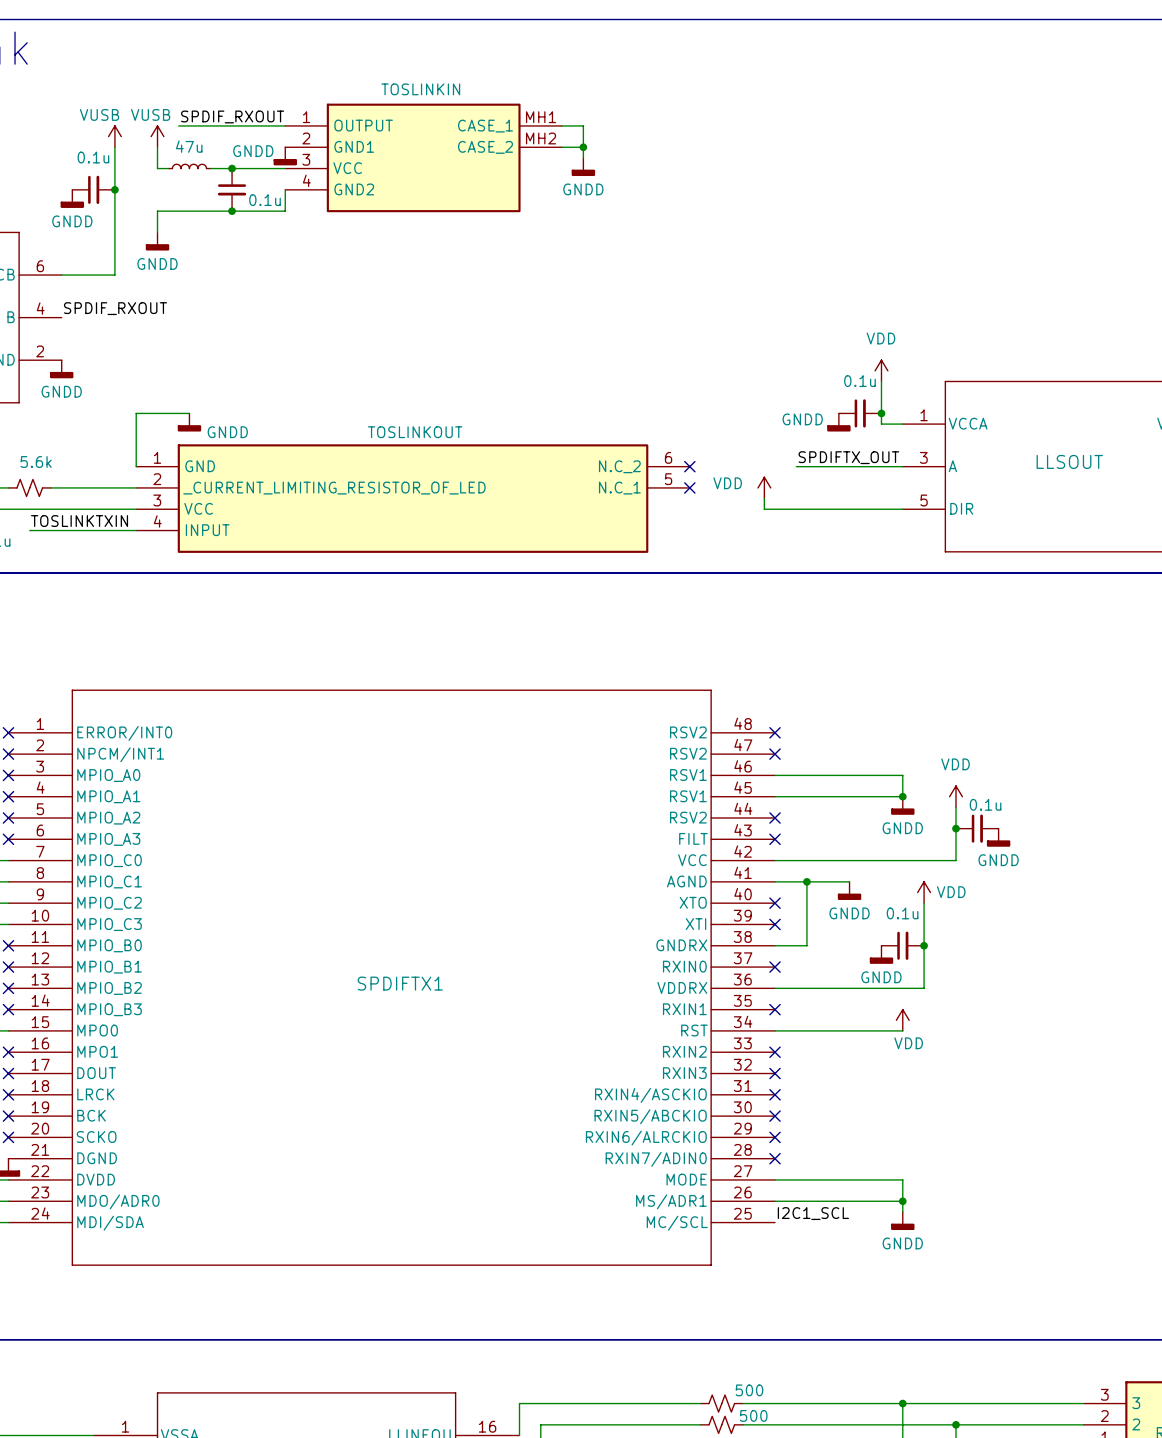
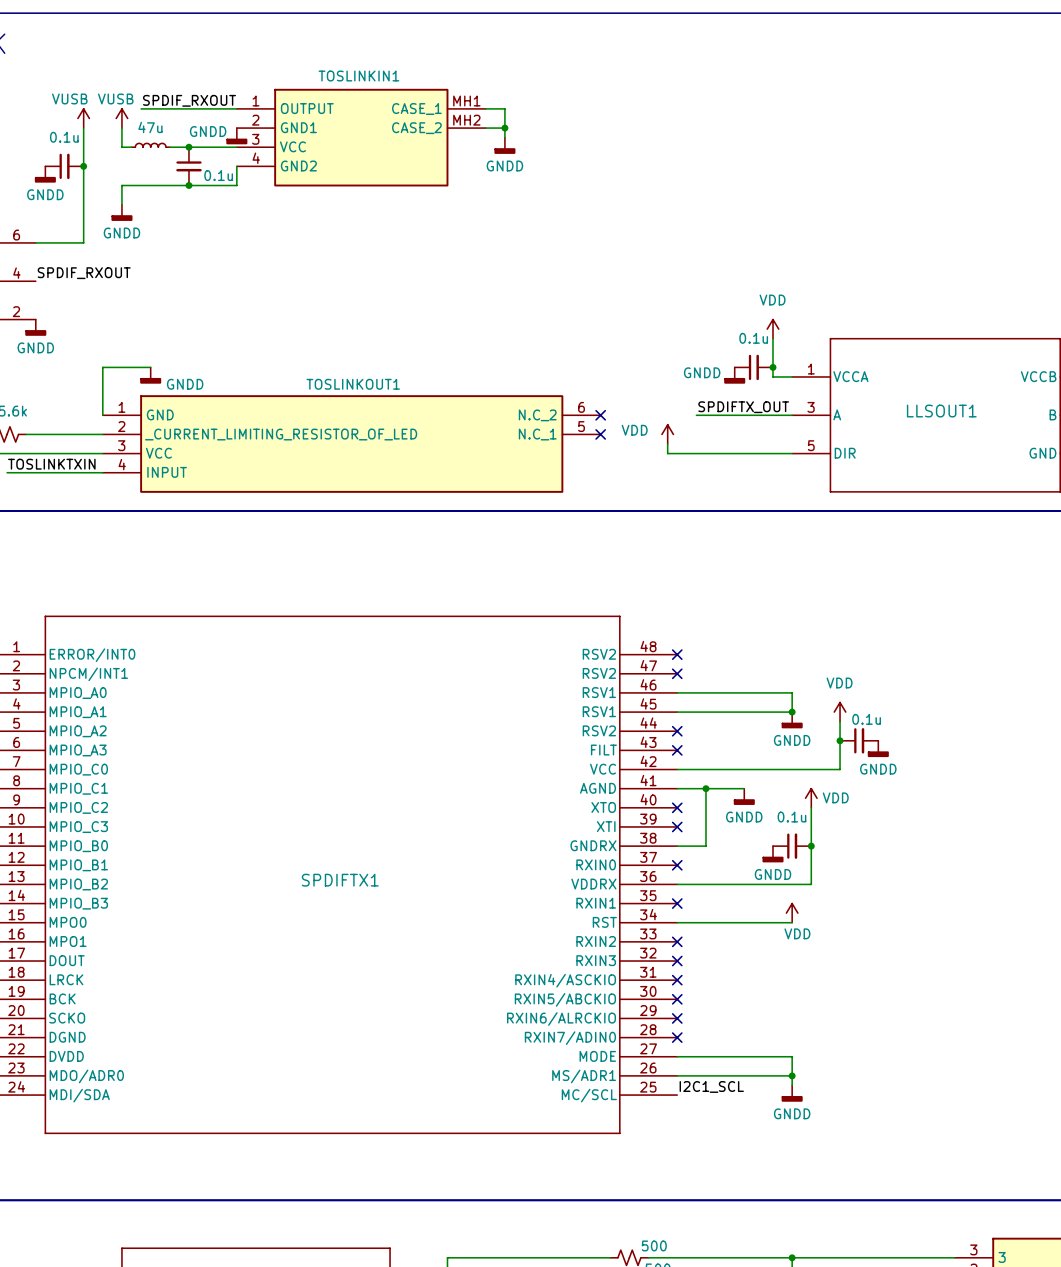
TOSLINKIN name: TOSLINKIN (420, 89) -> TOSLINKIN1 (358, 76)
TOSLINKOUT name: TOSLINKOUT (415, 432) -> TOSLINKOUT1 (353, 384)
LLSOUT name: LLSOUT (1069, 461) -> LLSOUT1 (941, 411)

